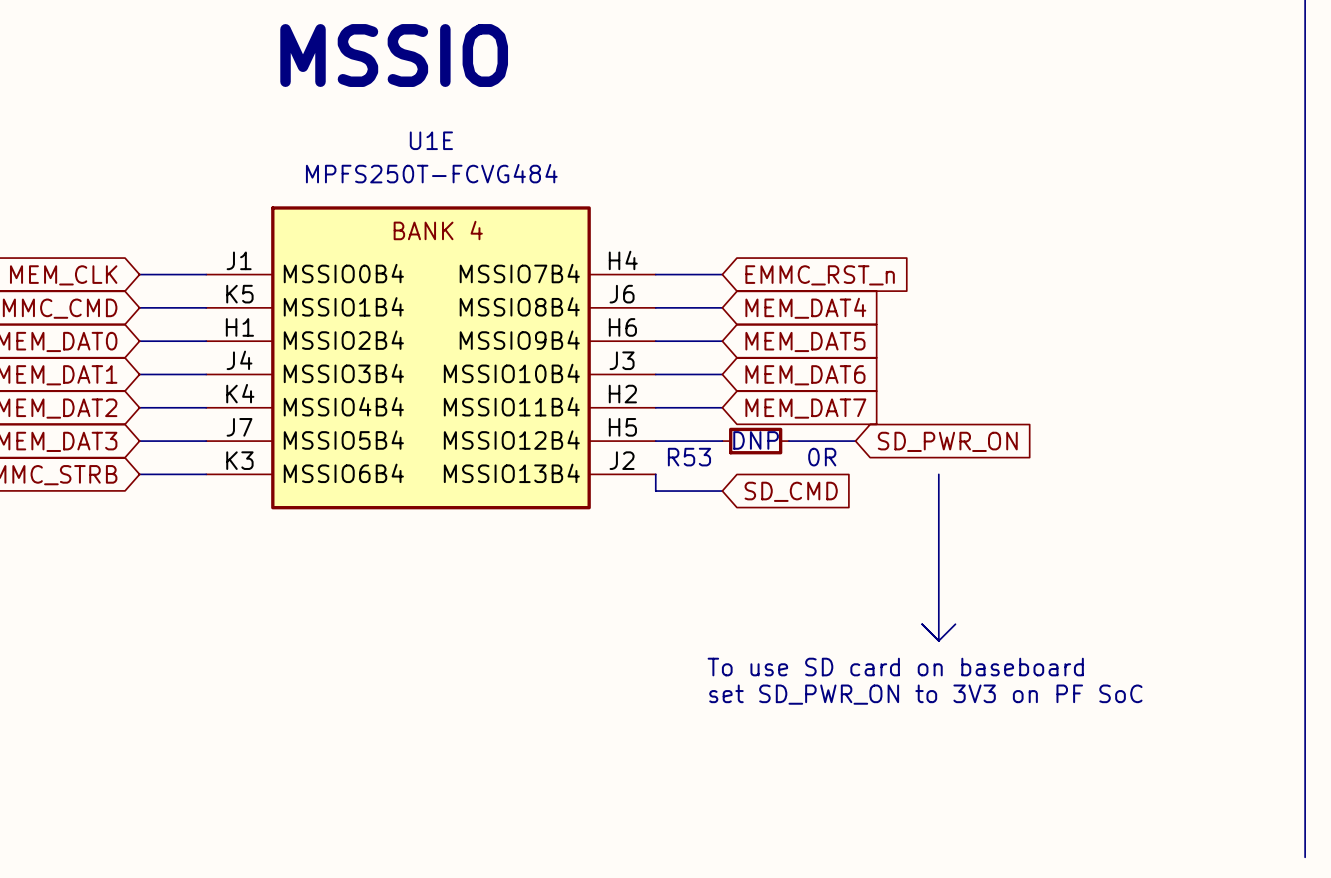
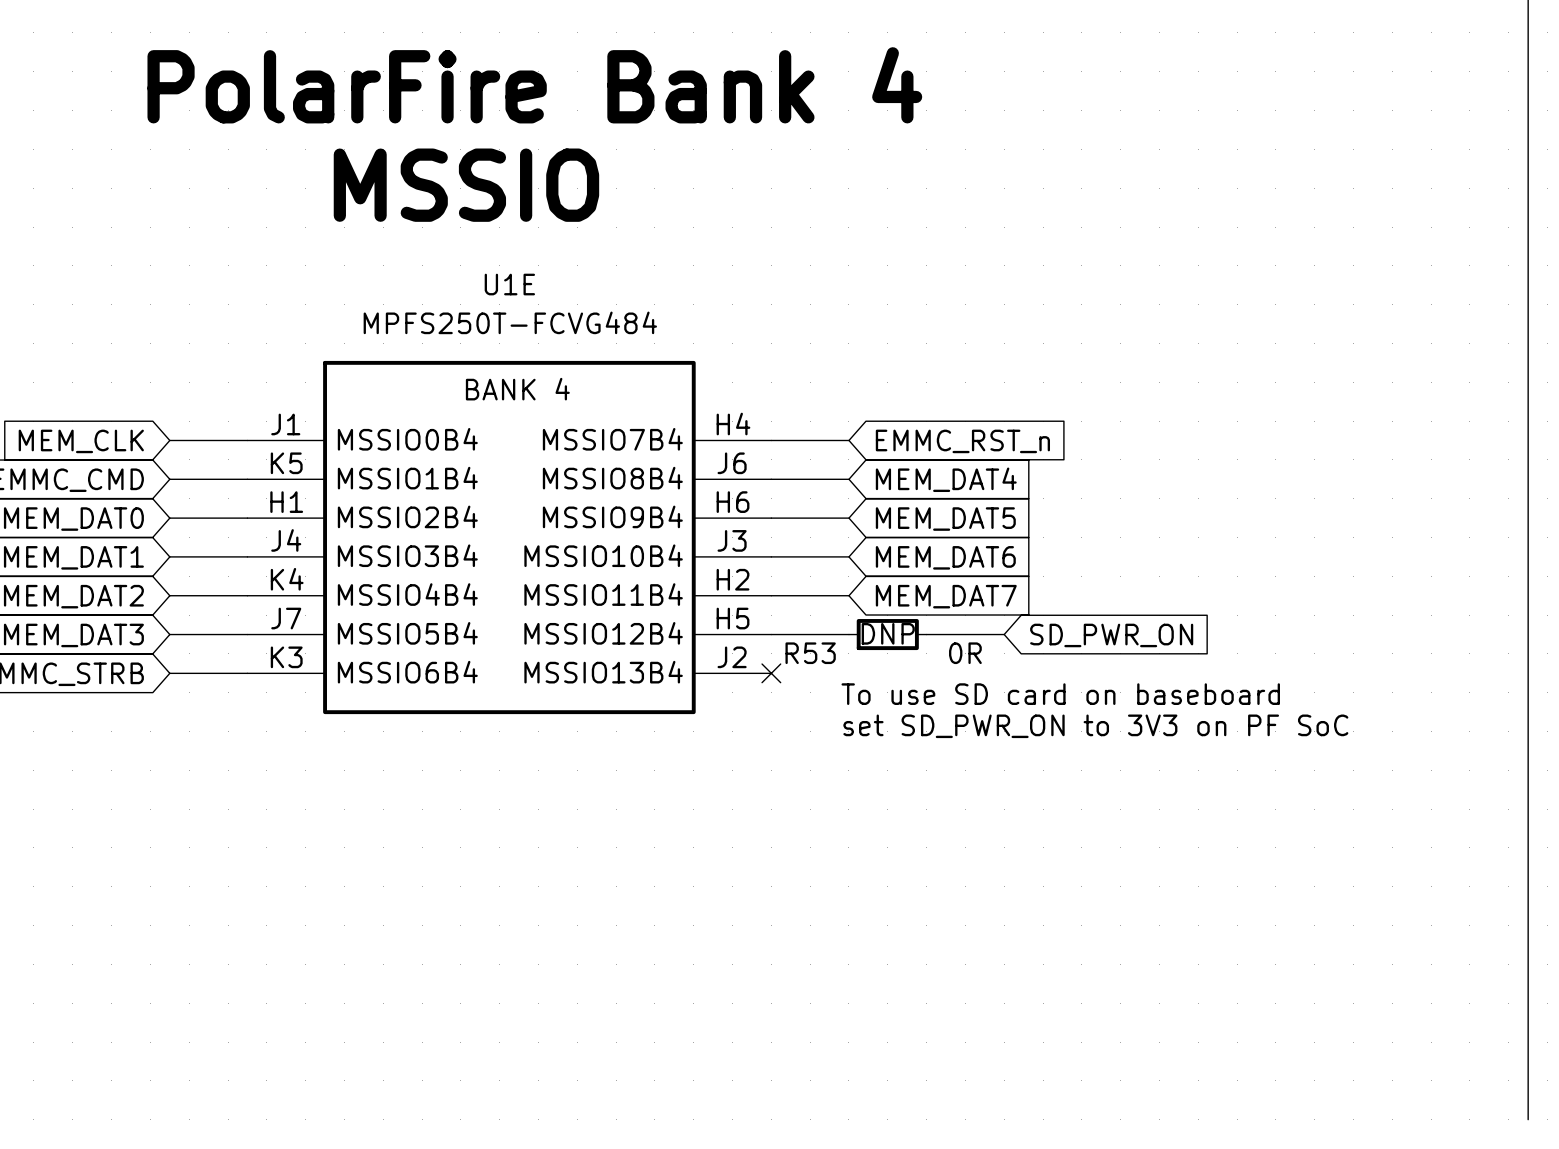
wire: (655, 474) (655, 491) (722, 491) -> none
no-connect mark: none -> (771, 673)
line: (938, 474) (938, 640) -> none
global label: SD_CMD (791, 491) -> none
line: (922, 624) (938, 640) -> none
line: (955, 624) (938, 640) -> none
text position: To use SD card on baseboard (895, 667) -> To use SD card on baseboard (1060, 694)
text position: set SD_PWR_ON to 3V3 on PF SoC (925, 694) -> set SD_PWR_ON to 3V3 on PF SoC (1095, 726)

